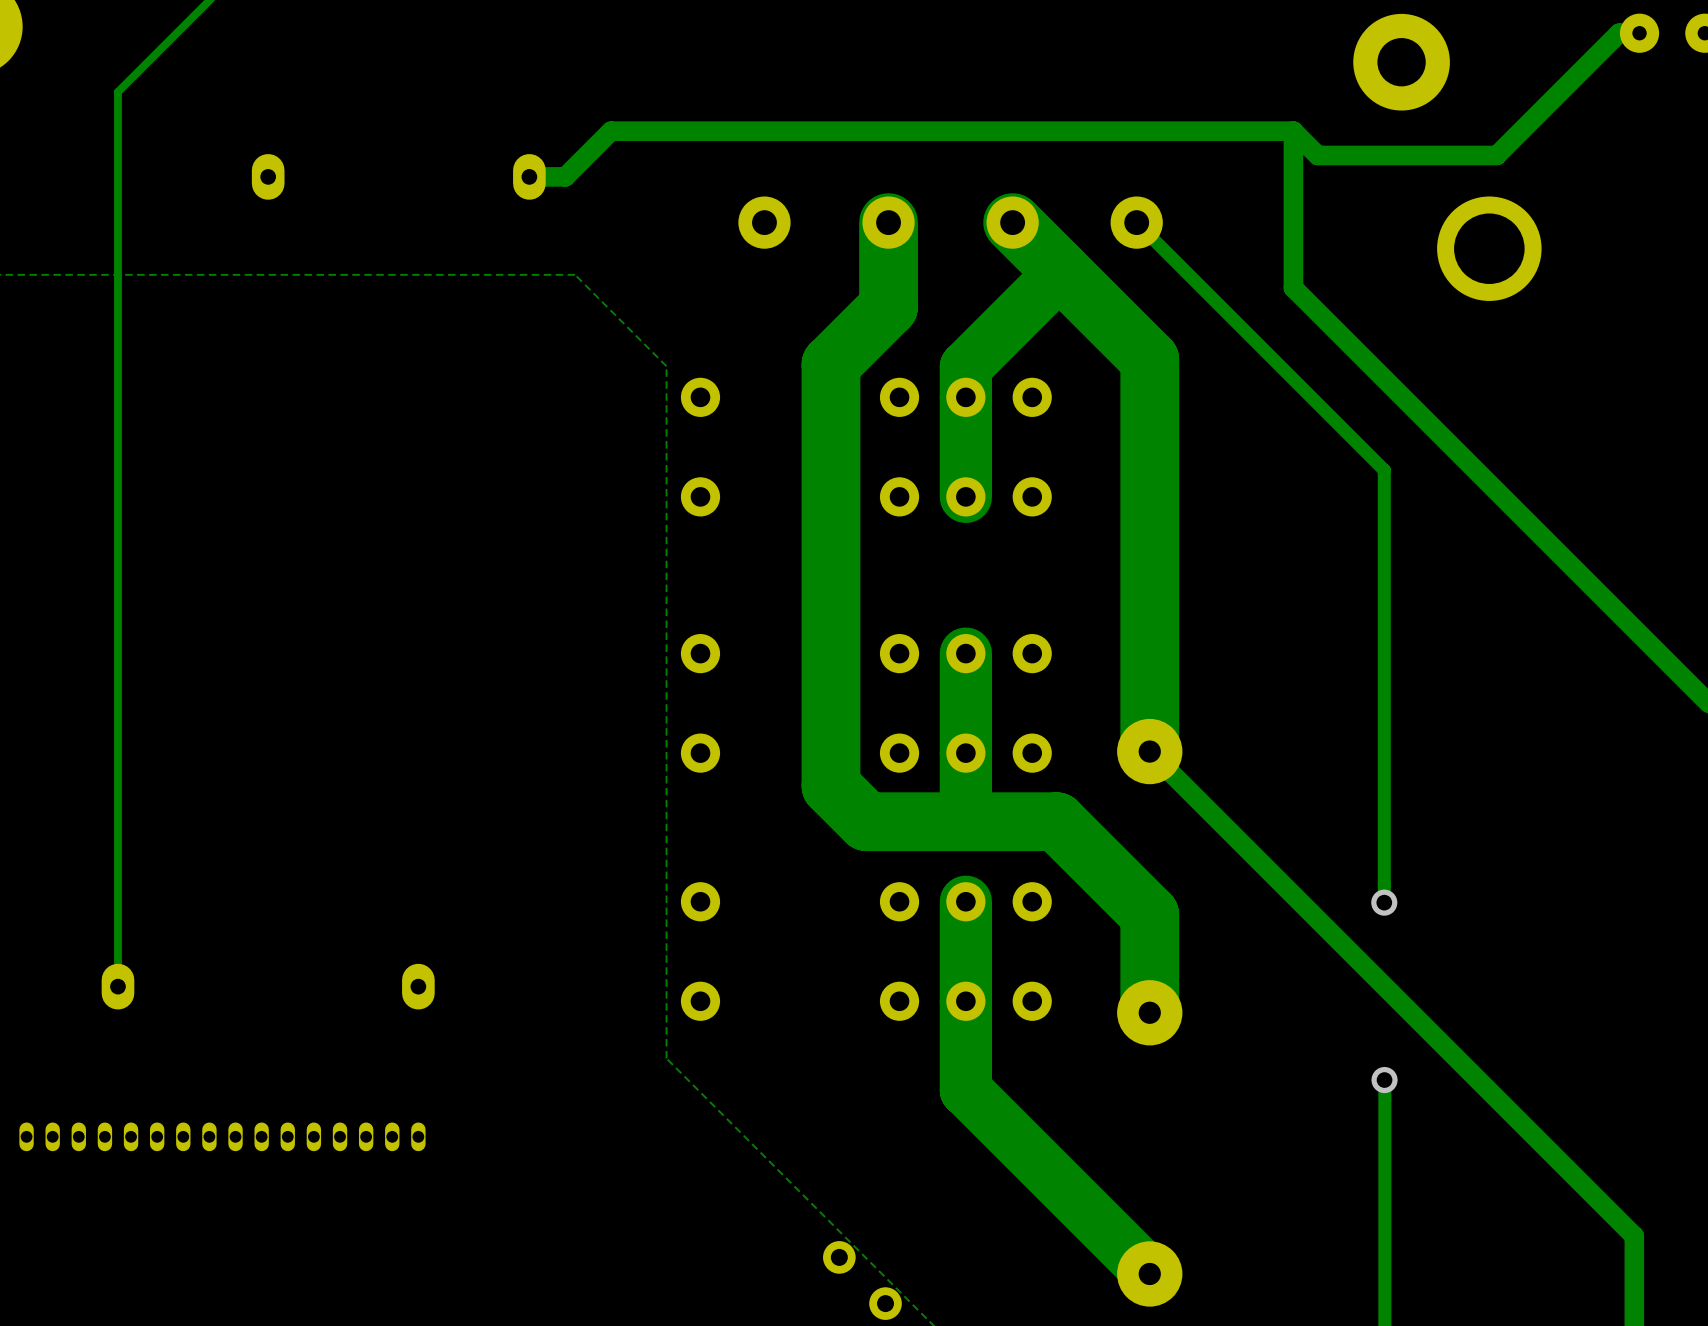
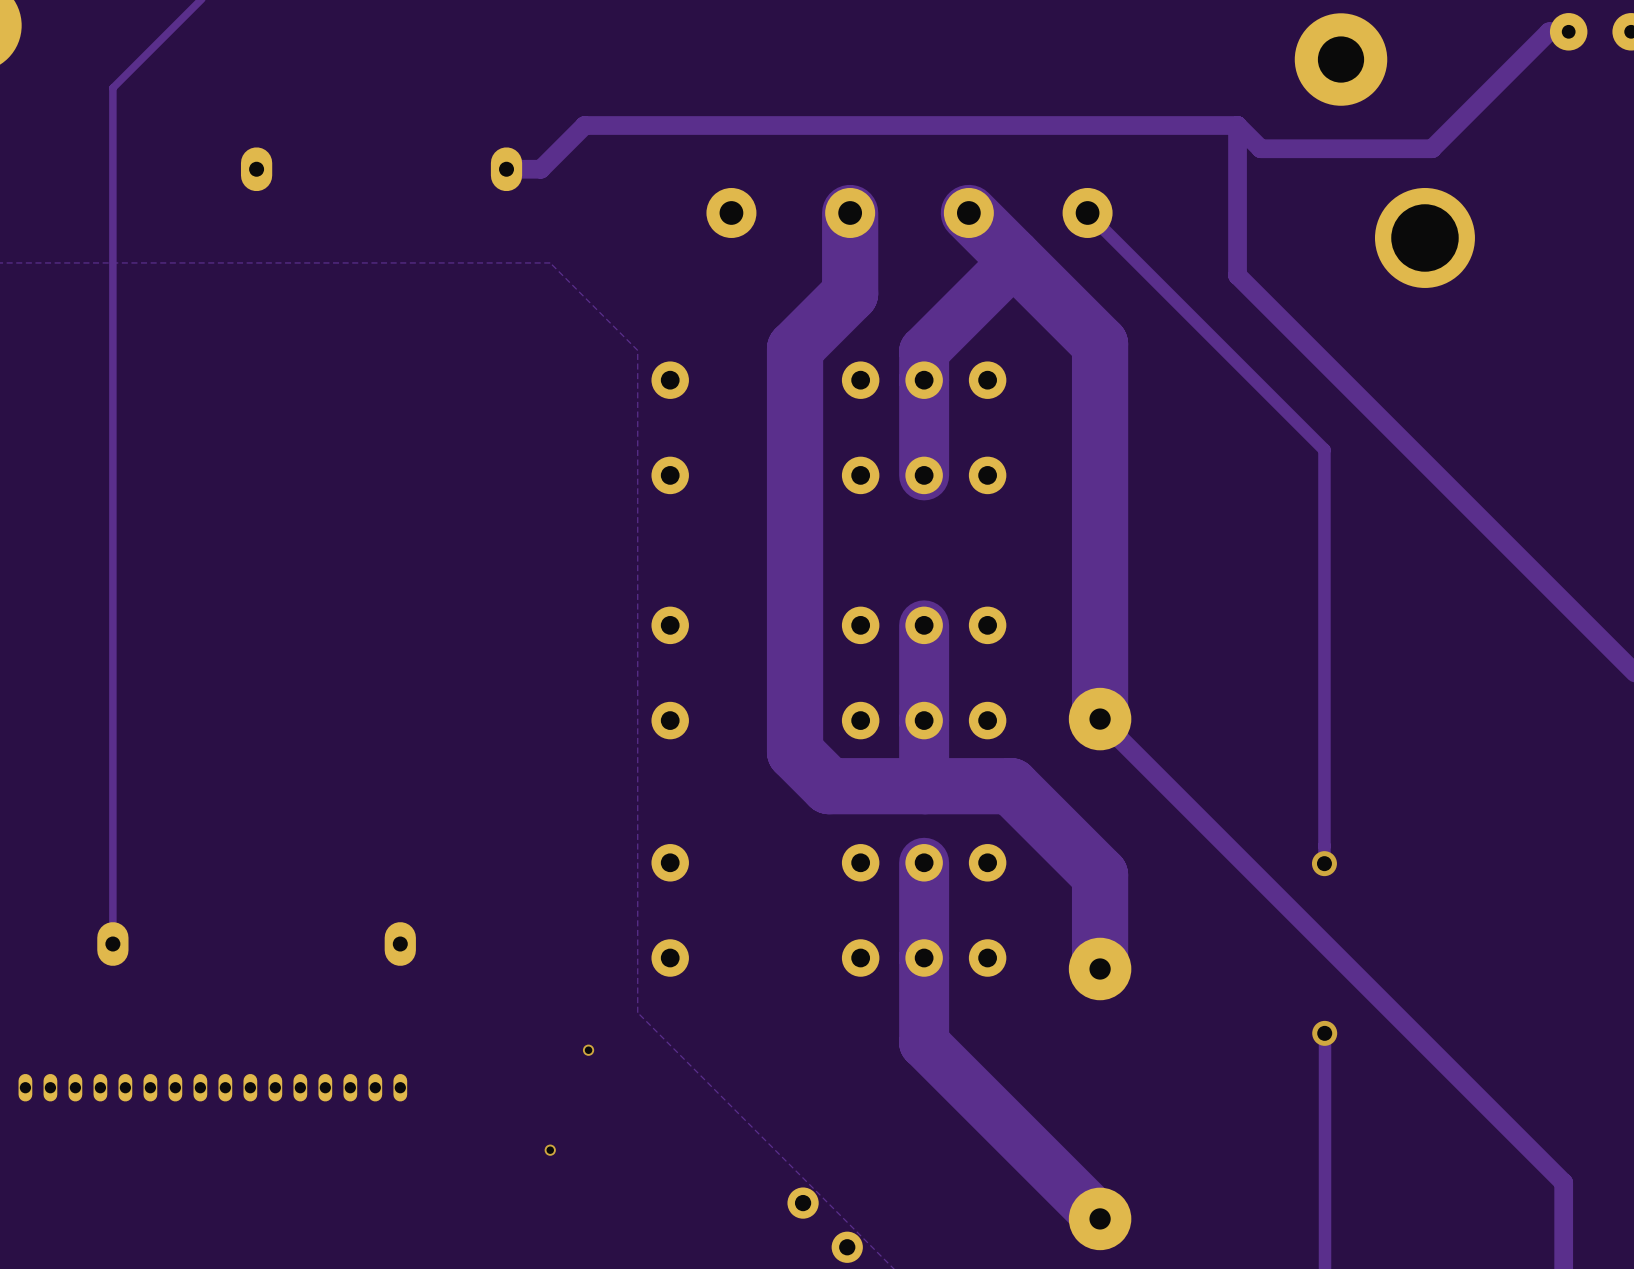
via: none -> (588, 1050)
via: none -> (550, 1150)

